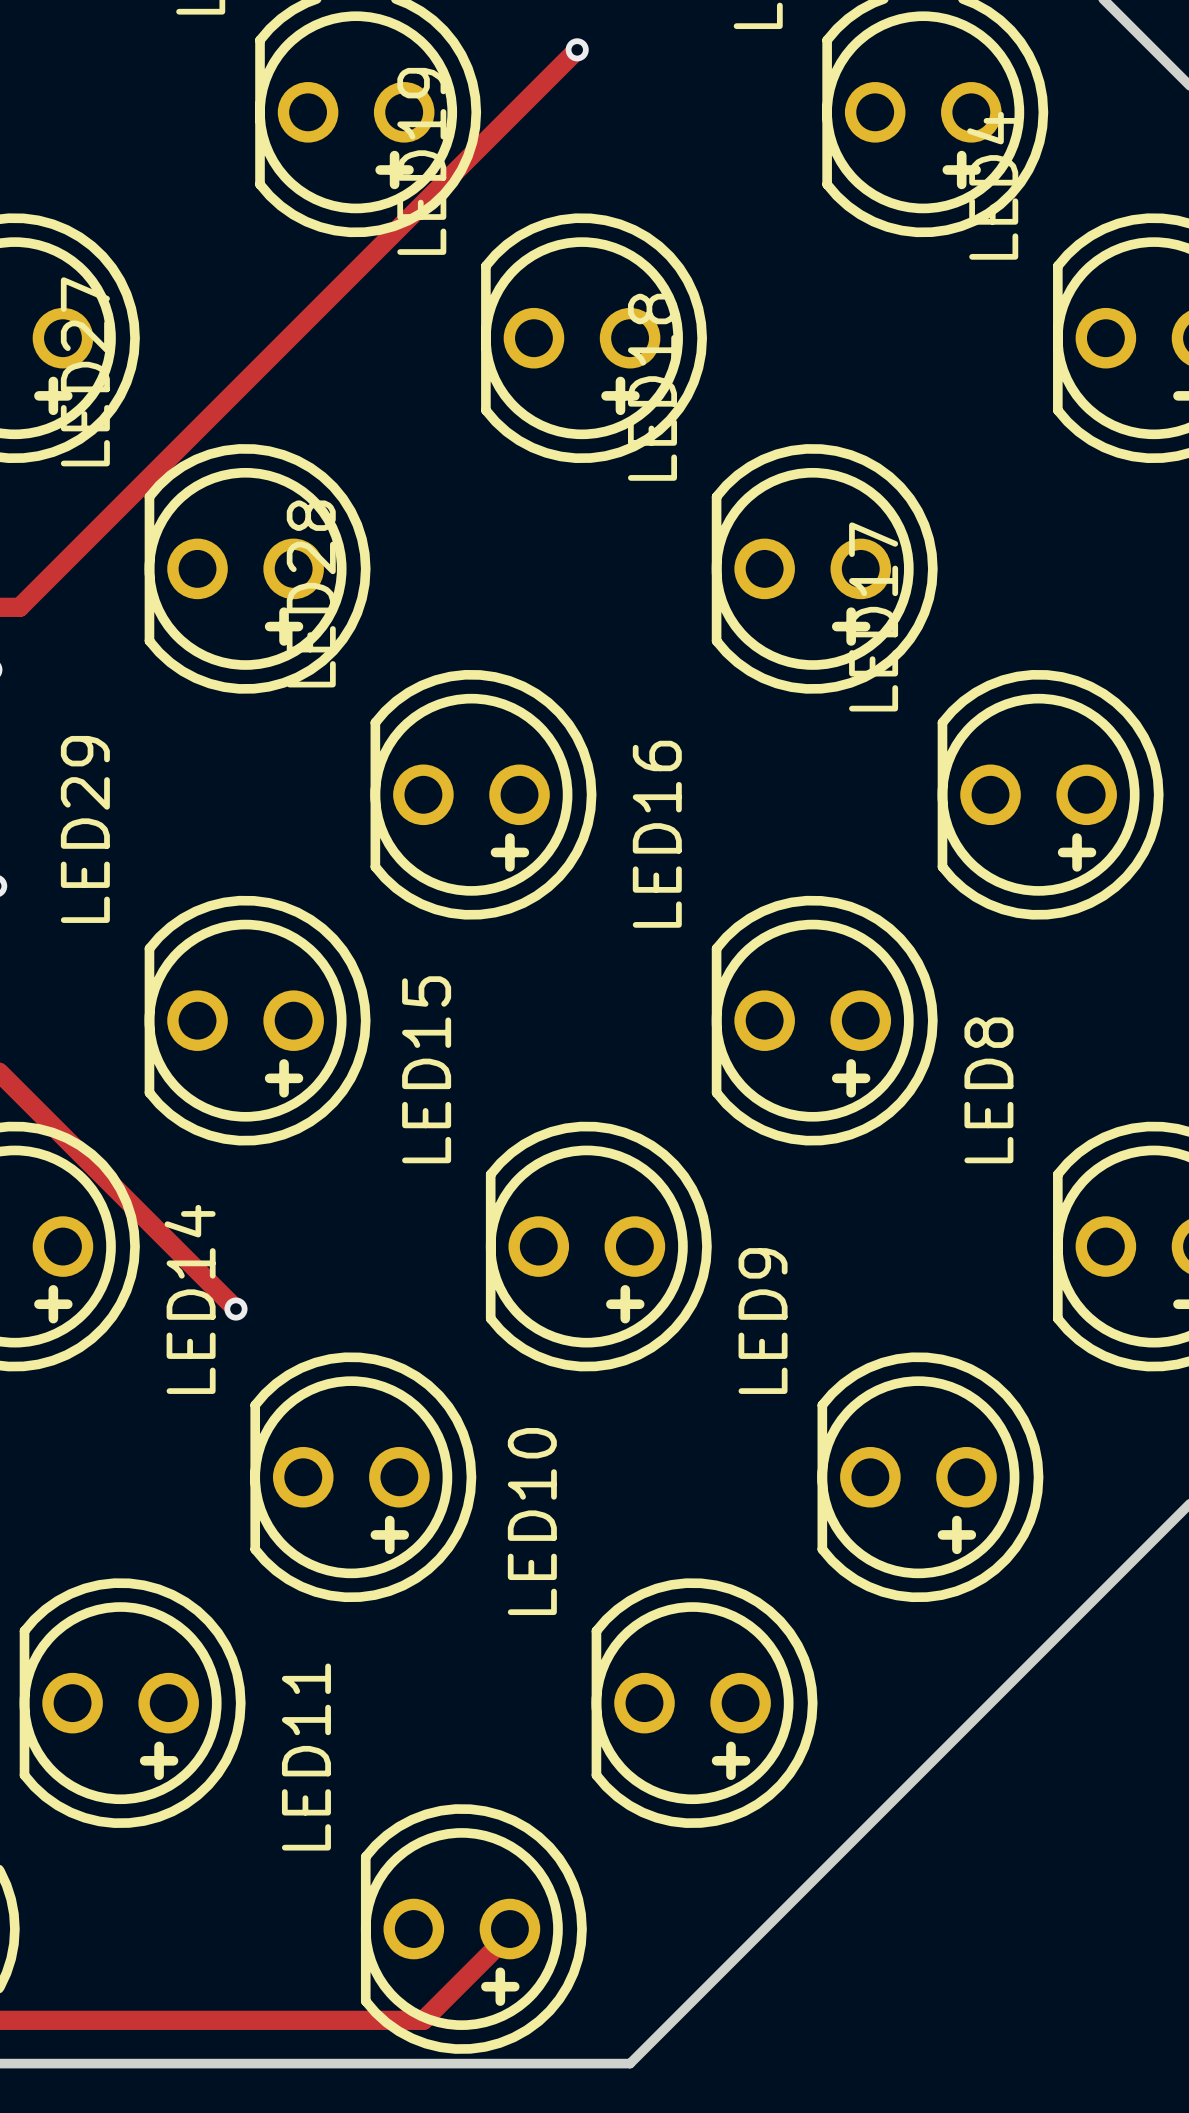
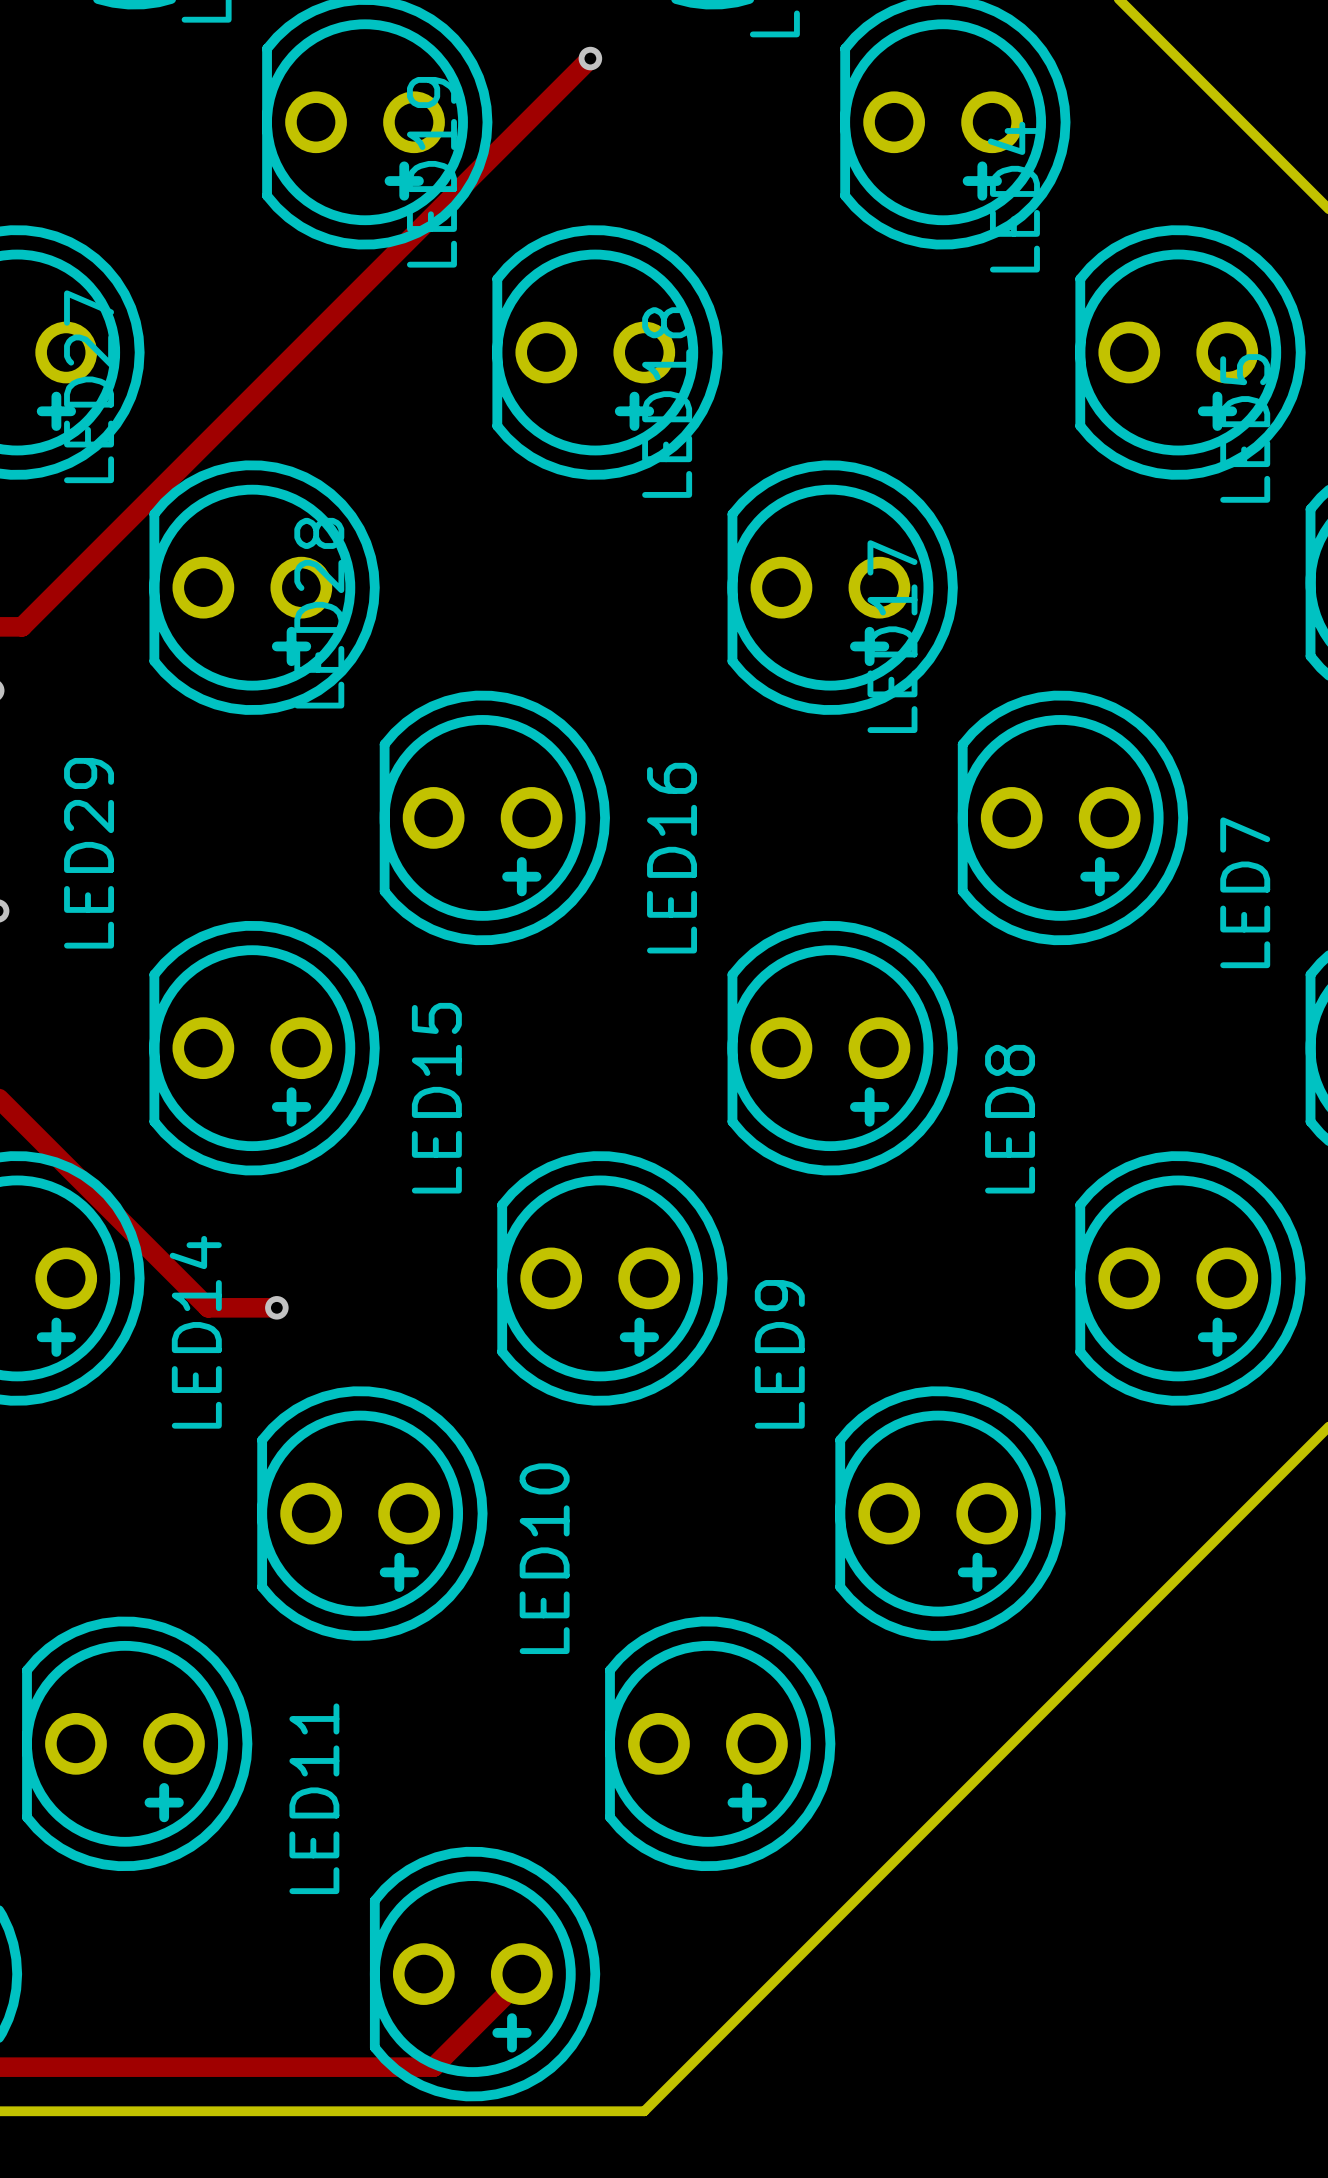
track: (202, 1275) (235, 1309) -> (208, 1307) (276, 1307)
via position: (235, 1309) -> (276, 1307)

